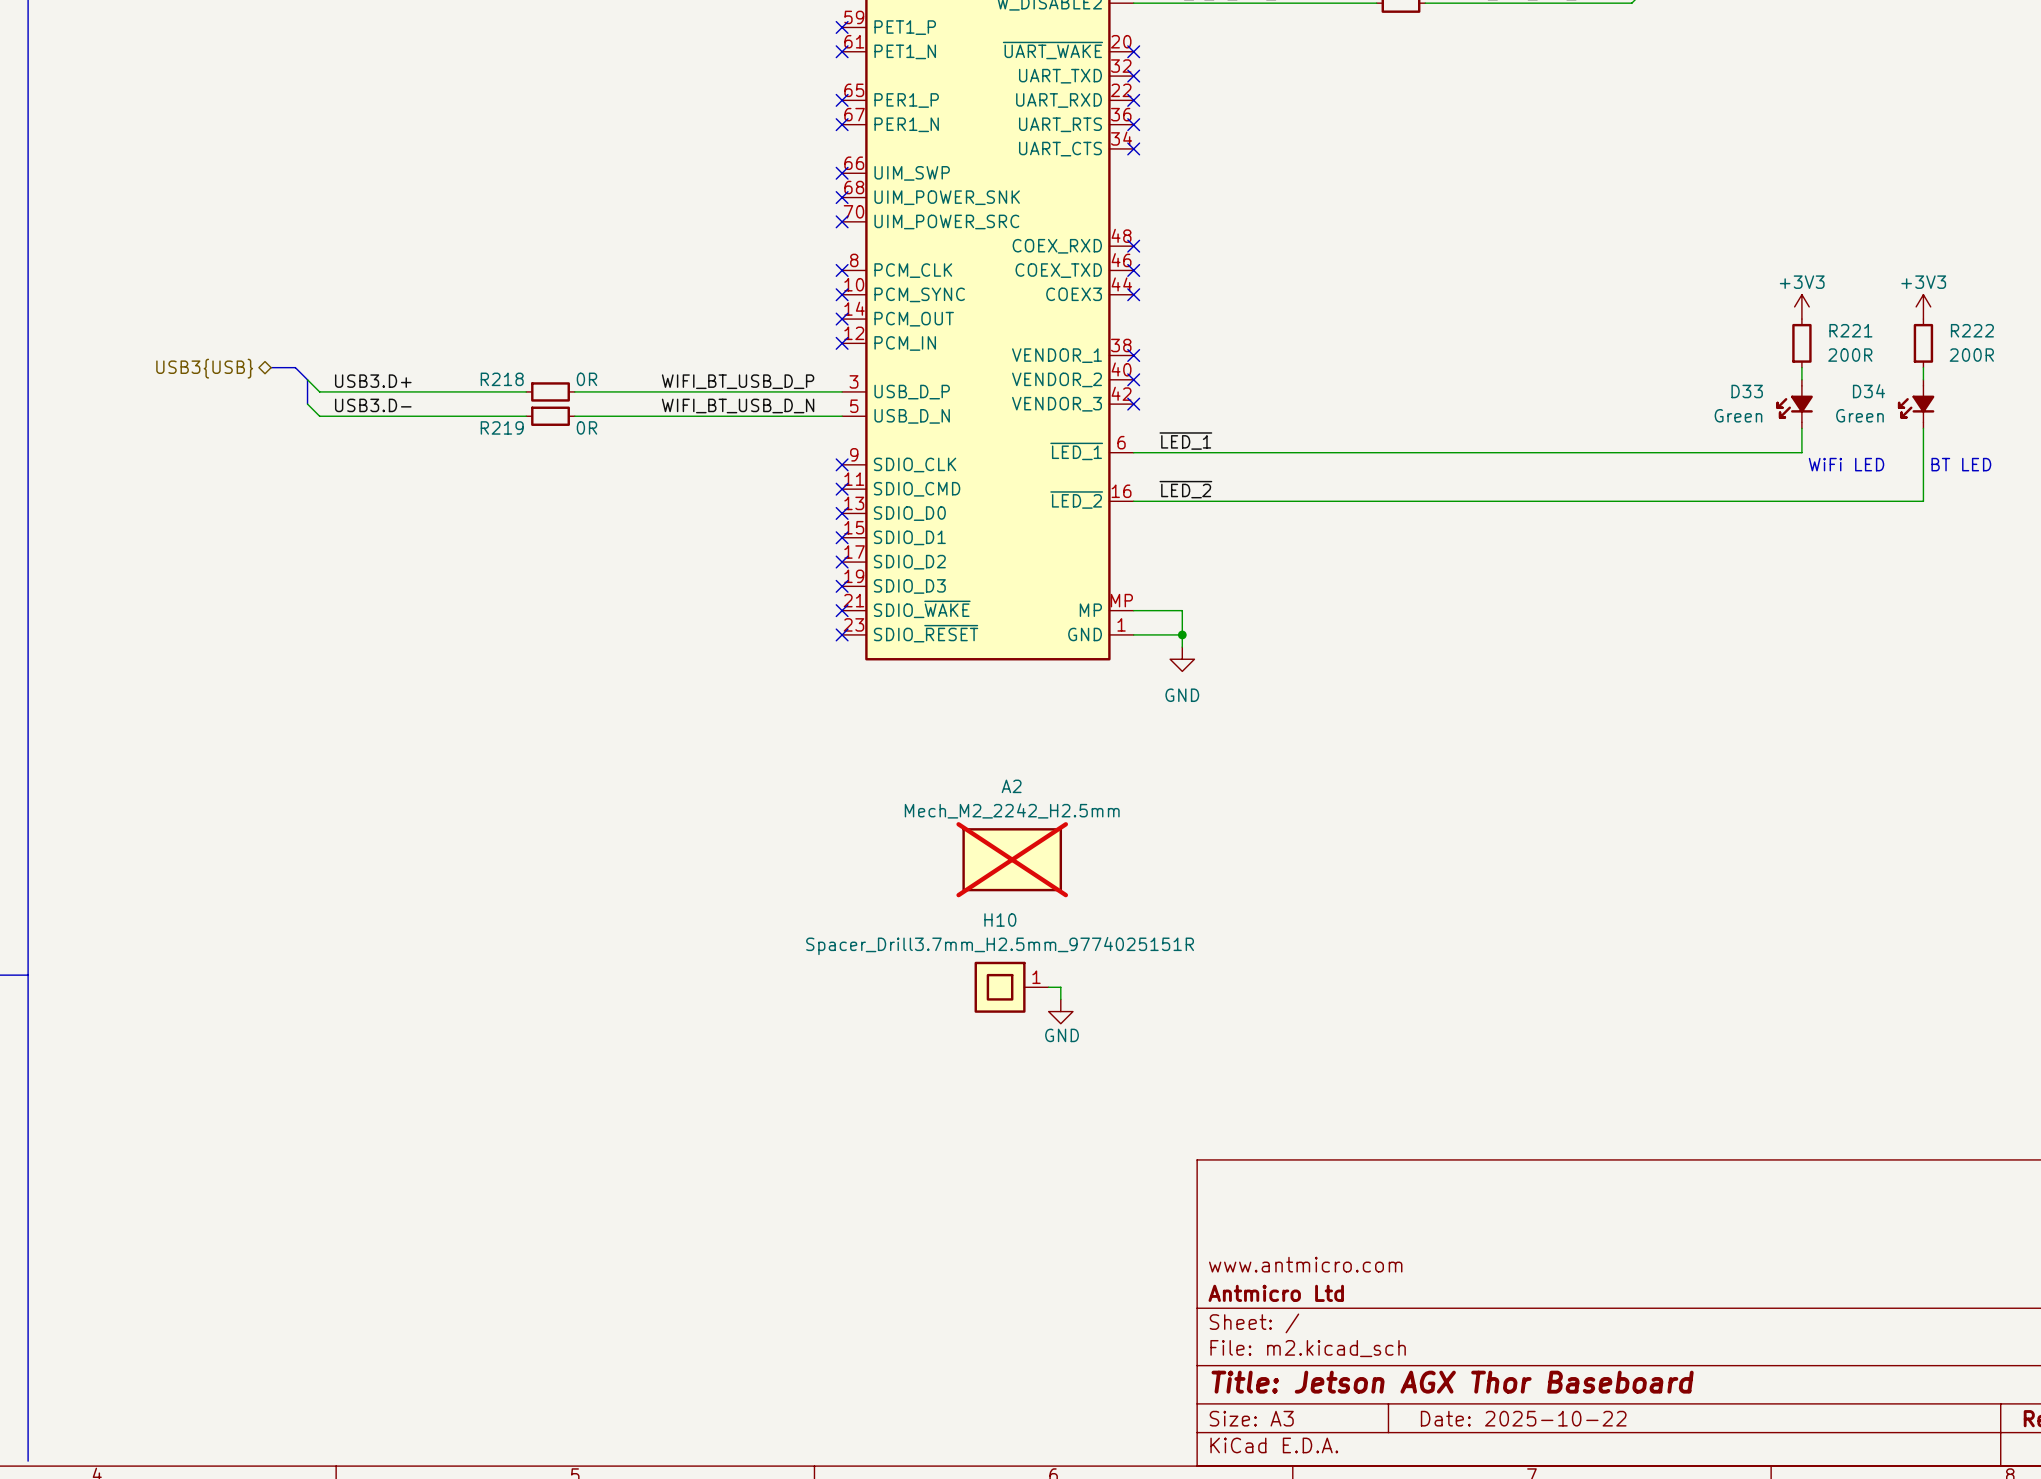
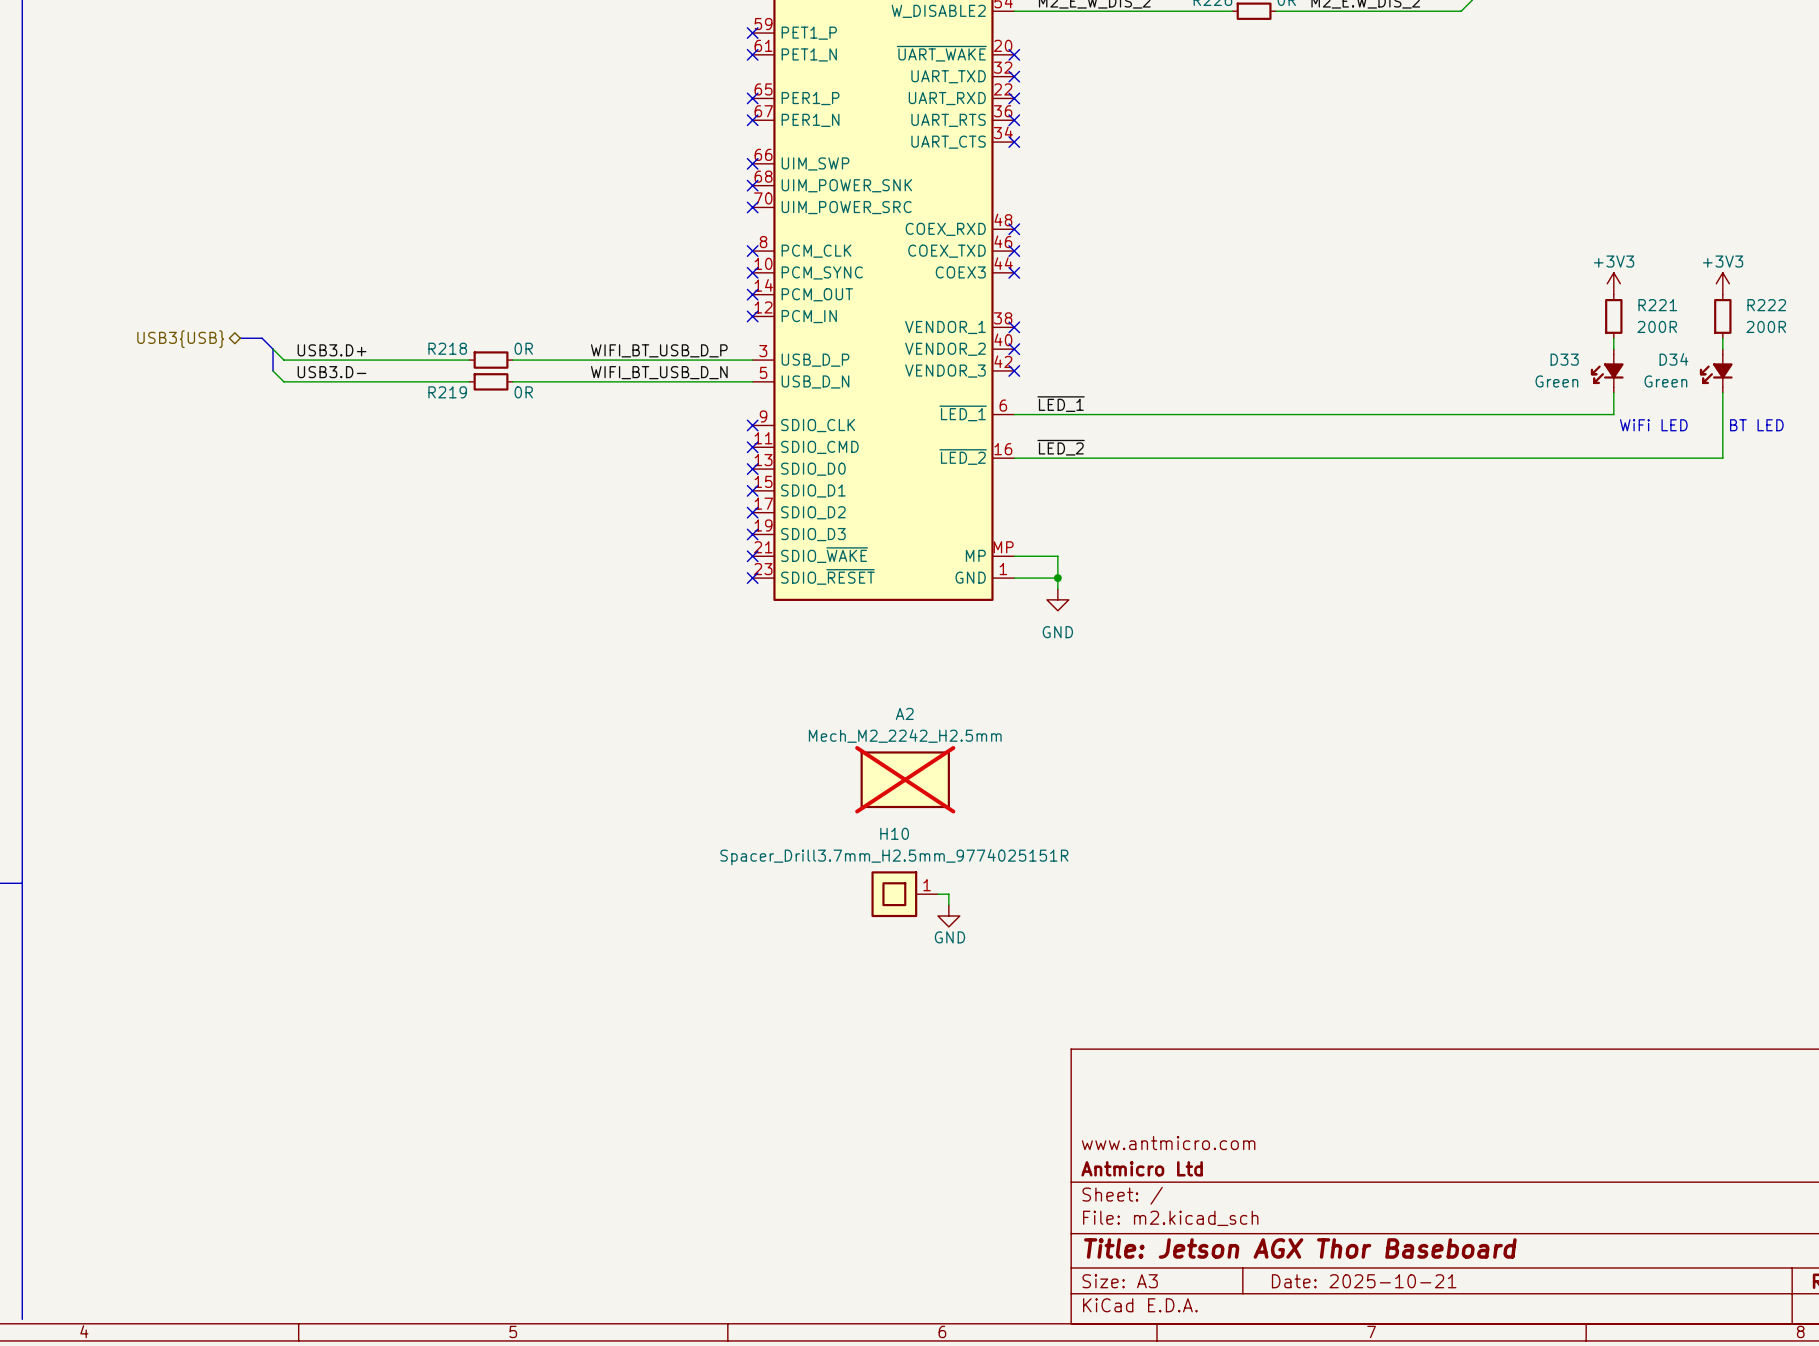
title block: Date: 2025-10-22 (1523, 1418) -> Date: 2025-10-21 (1364, 1281)

